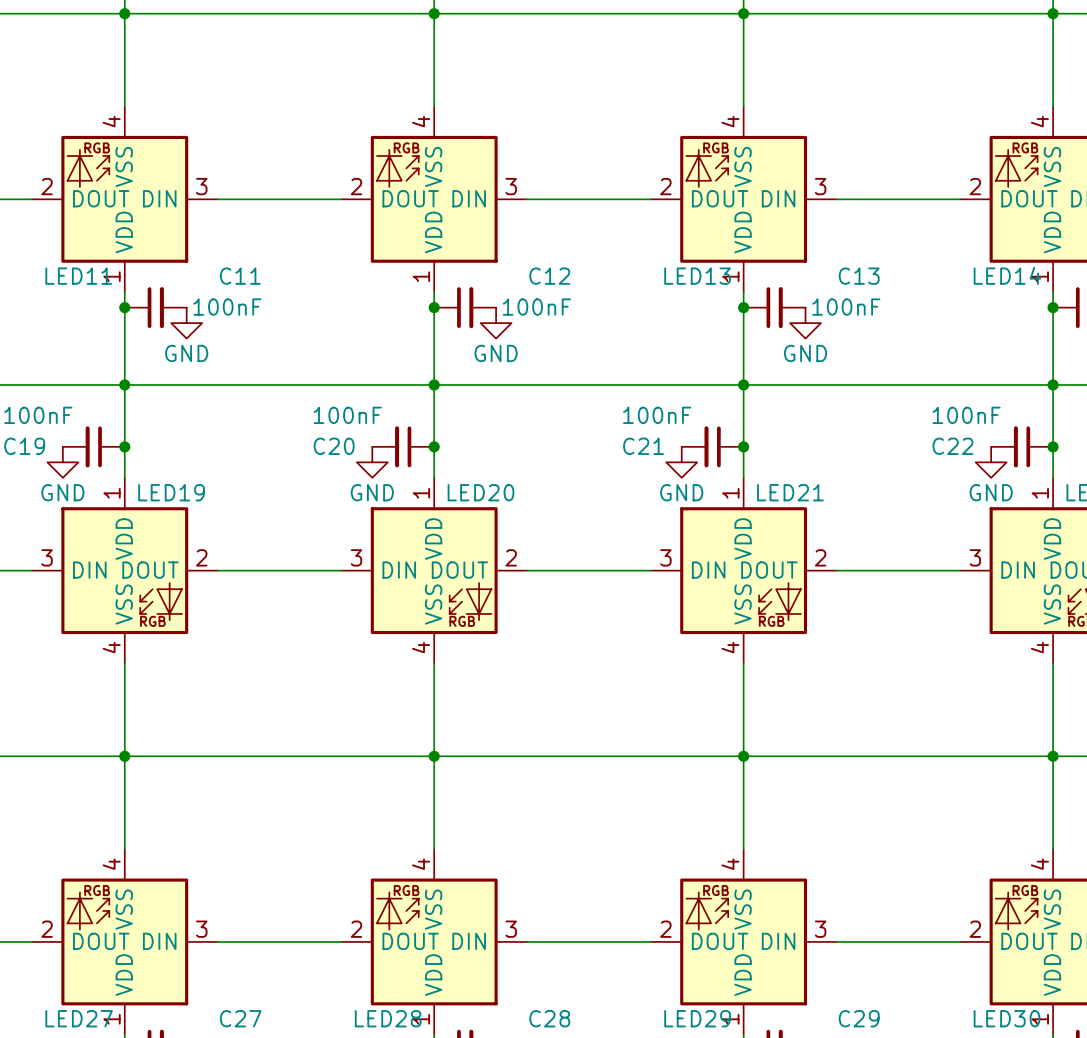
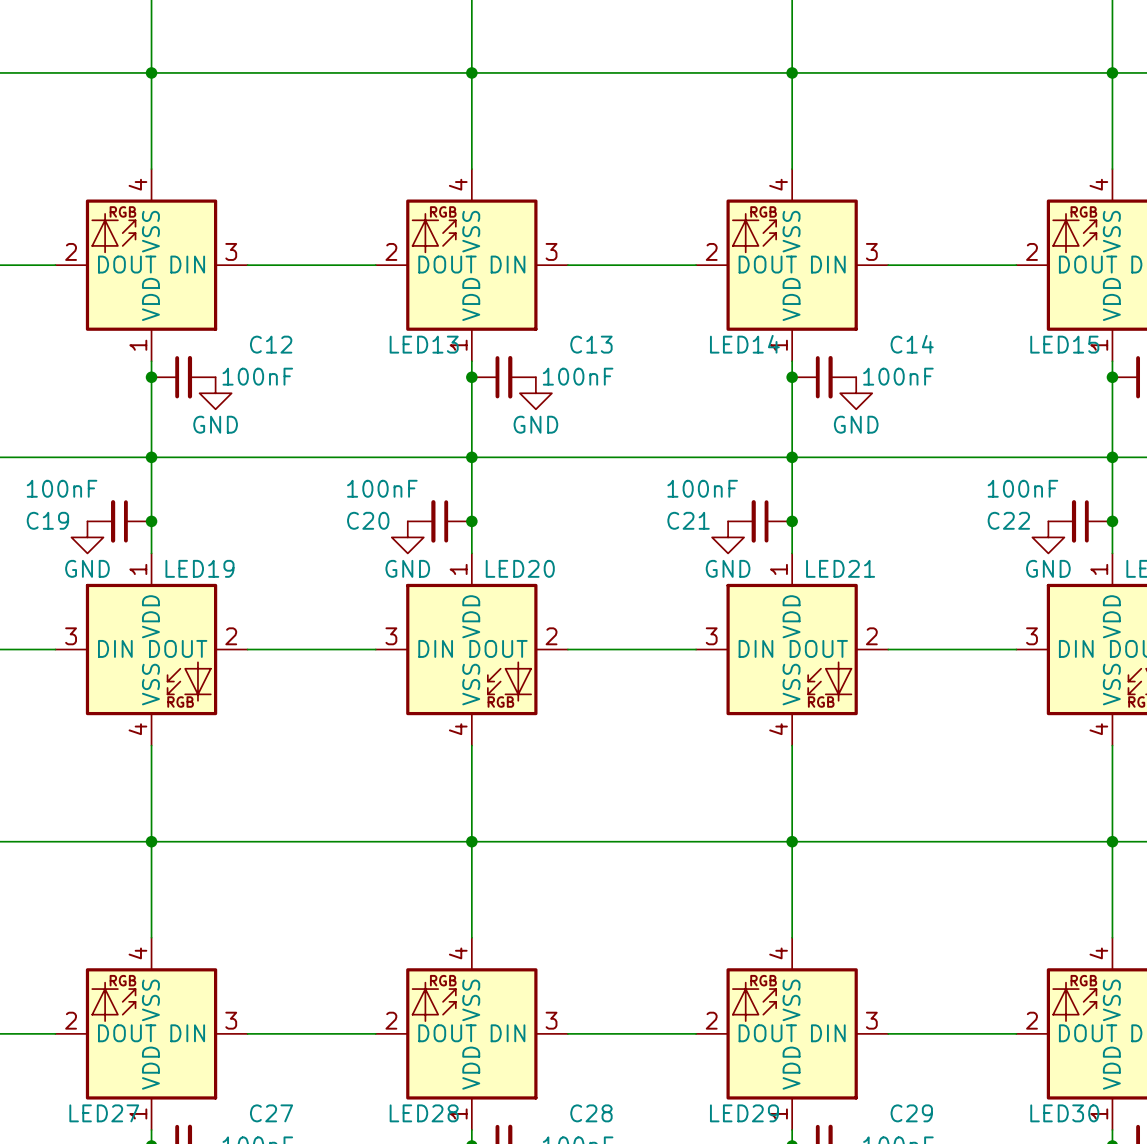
LED14 name: LED14 (1007, 275) -> LED15 (1064, 344)
LED11 name: LED11 (78, 276) -> none
C11 name: C11 (240, 276) -> C12 (271, 344)
LED13 name: none -> LED13 (424, 344)
C12 name: C12 (549, 276) -> C13 (591, 344)
LED13 name: LED13 (697, 276) -> LED14 (744, 344)
C13 name: C13 (859, 276) -> C14 (912, 344)

